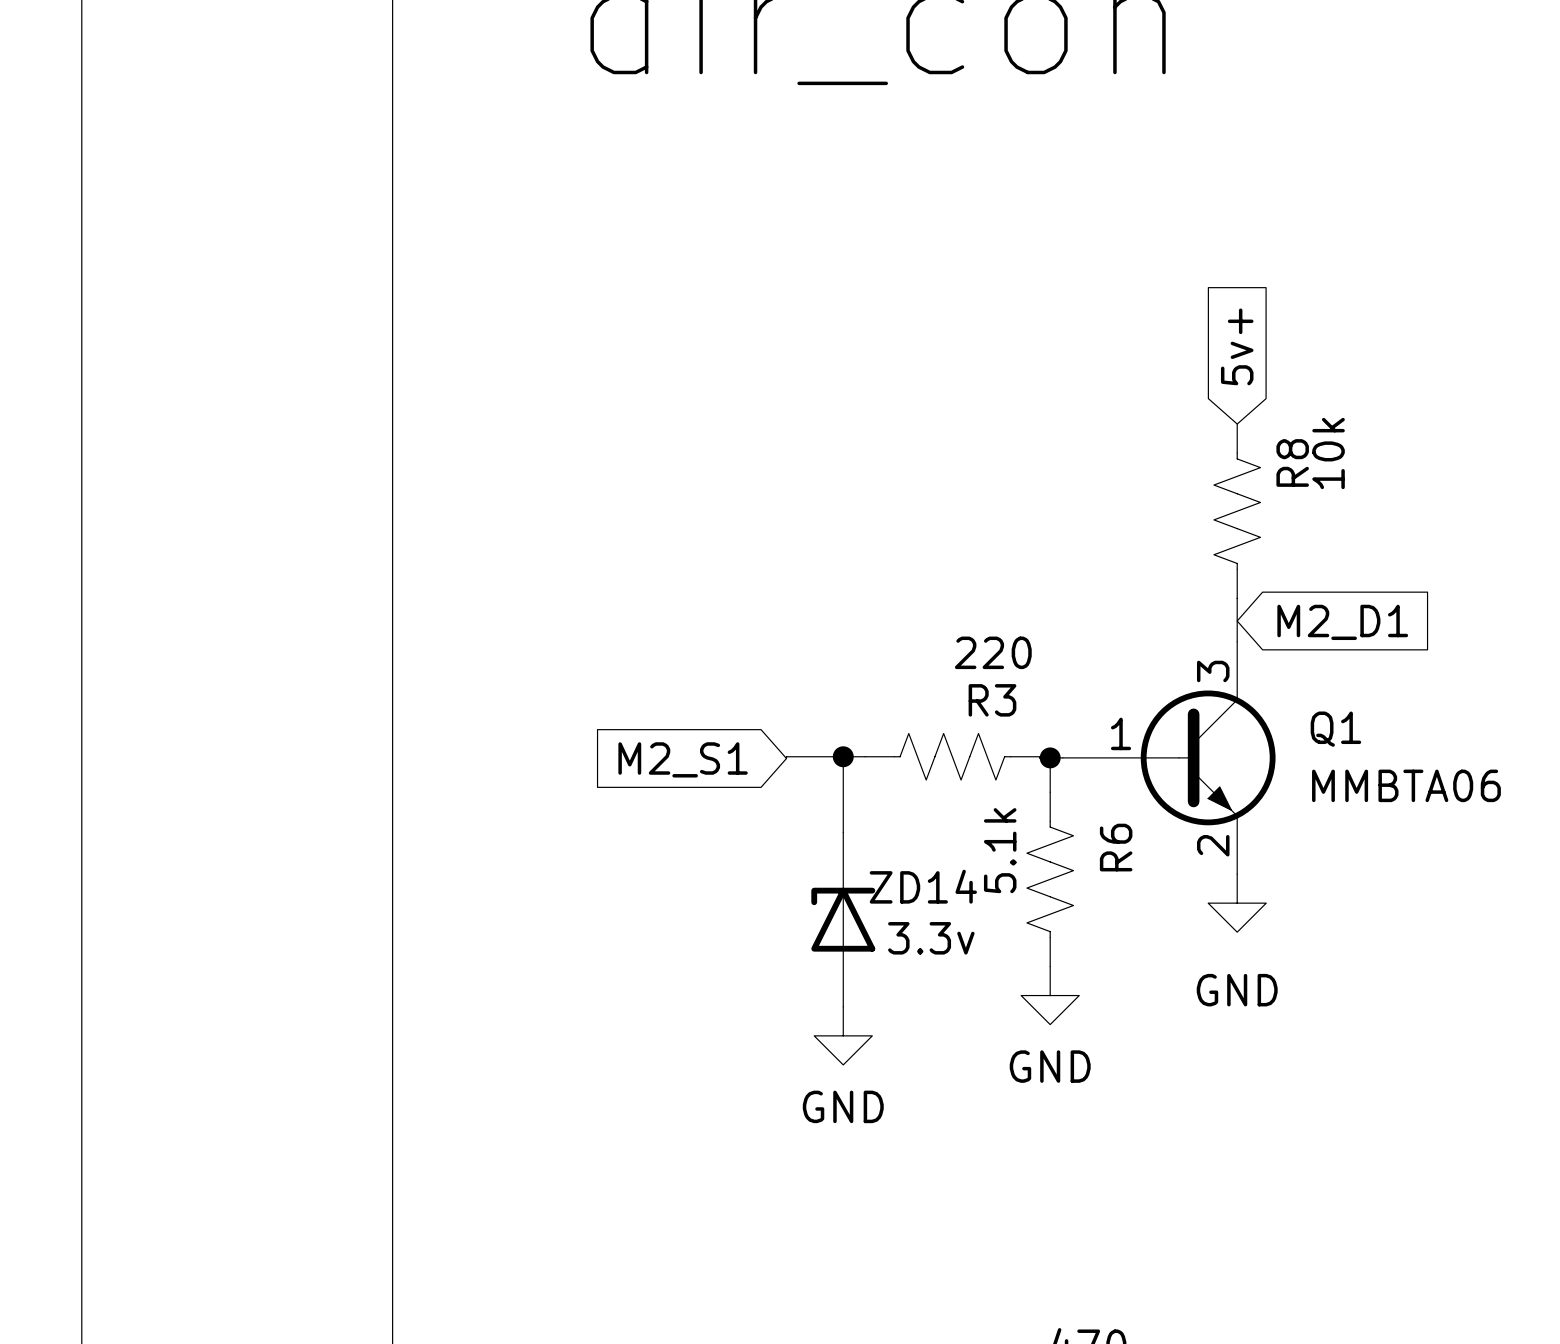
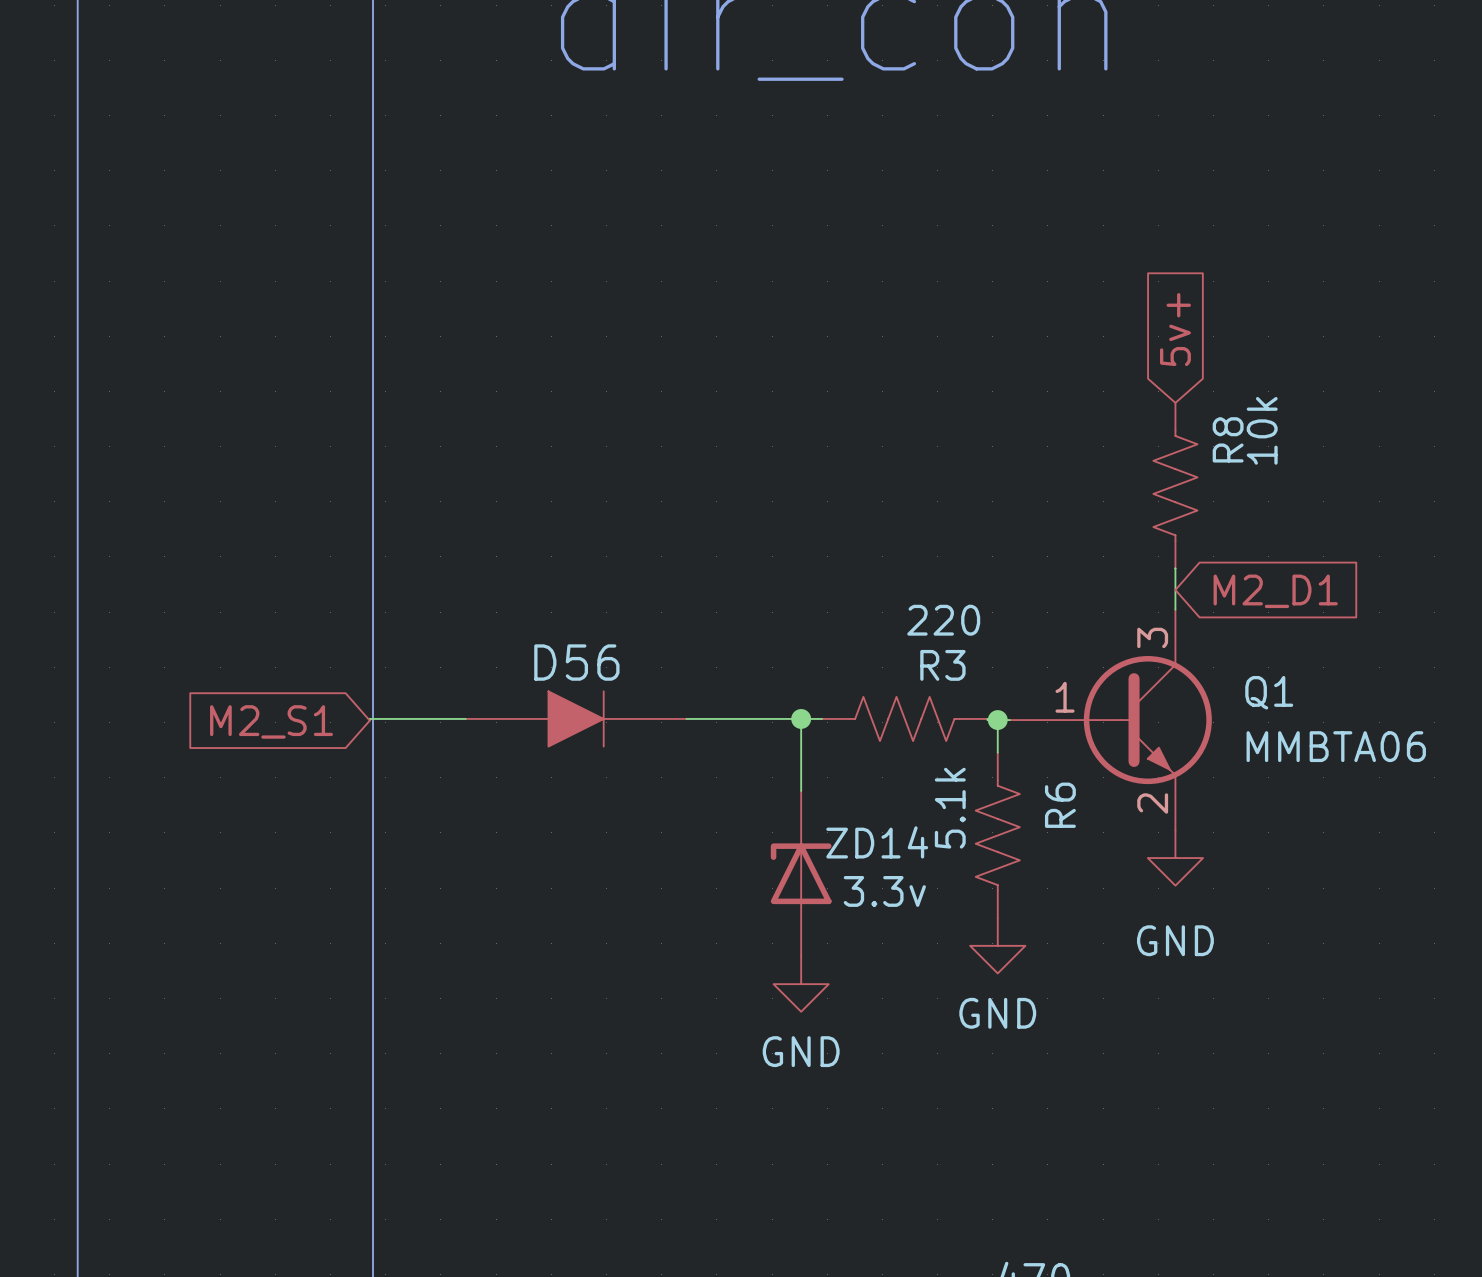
wire: none -> (465, 718) (369, 718) (369, 720)
D56: none -> (576, 718)
wire: (786, 756) (786, 758) -> (747, 718) (686, 718)
global label position: M2_S1 (683, 759) -> M2_S1 (271, 721)

